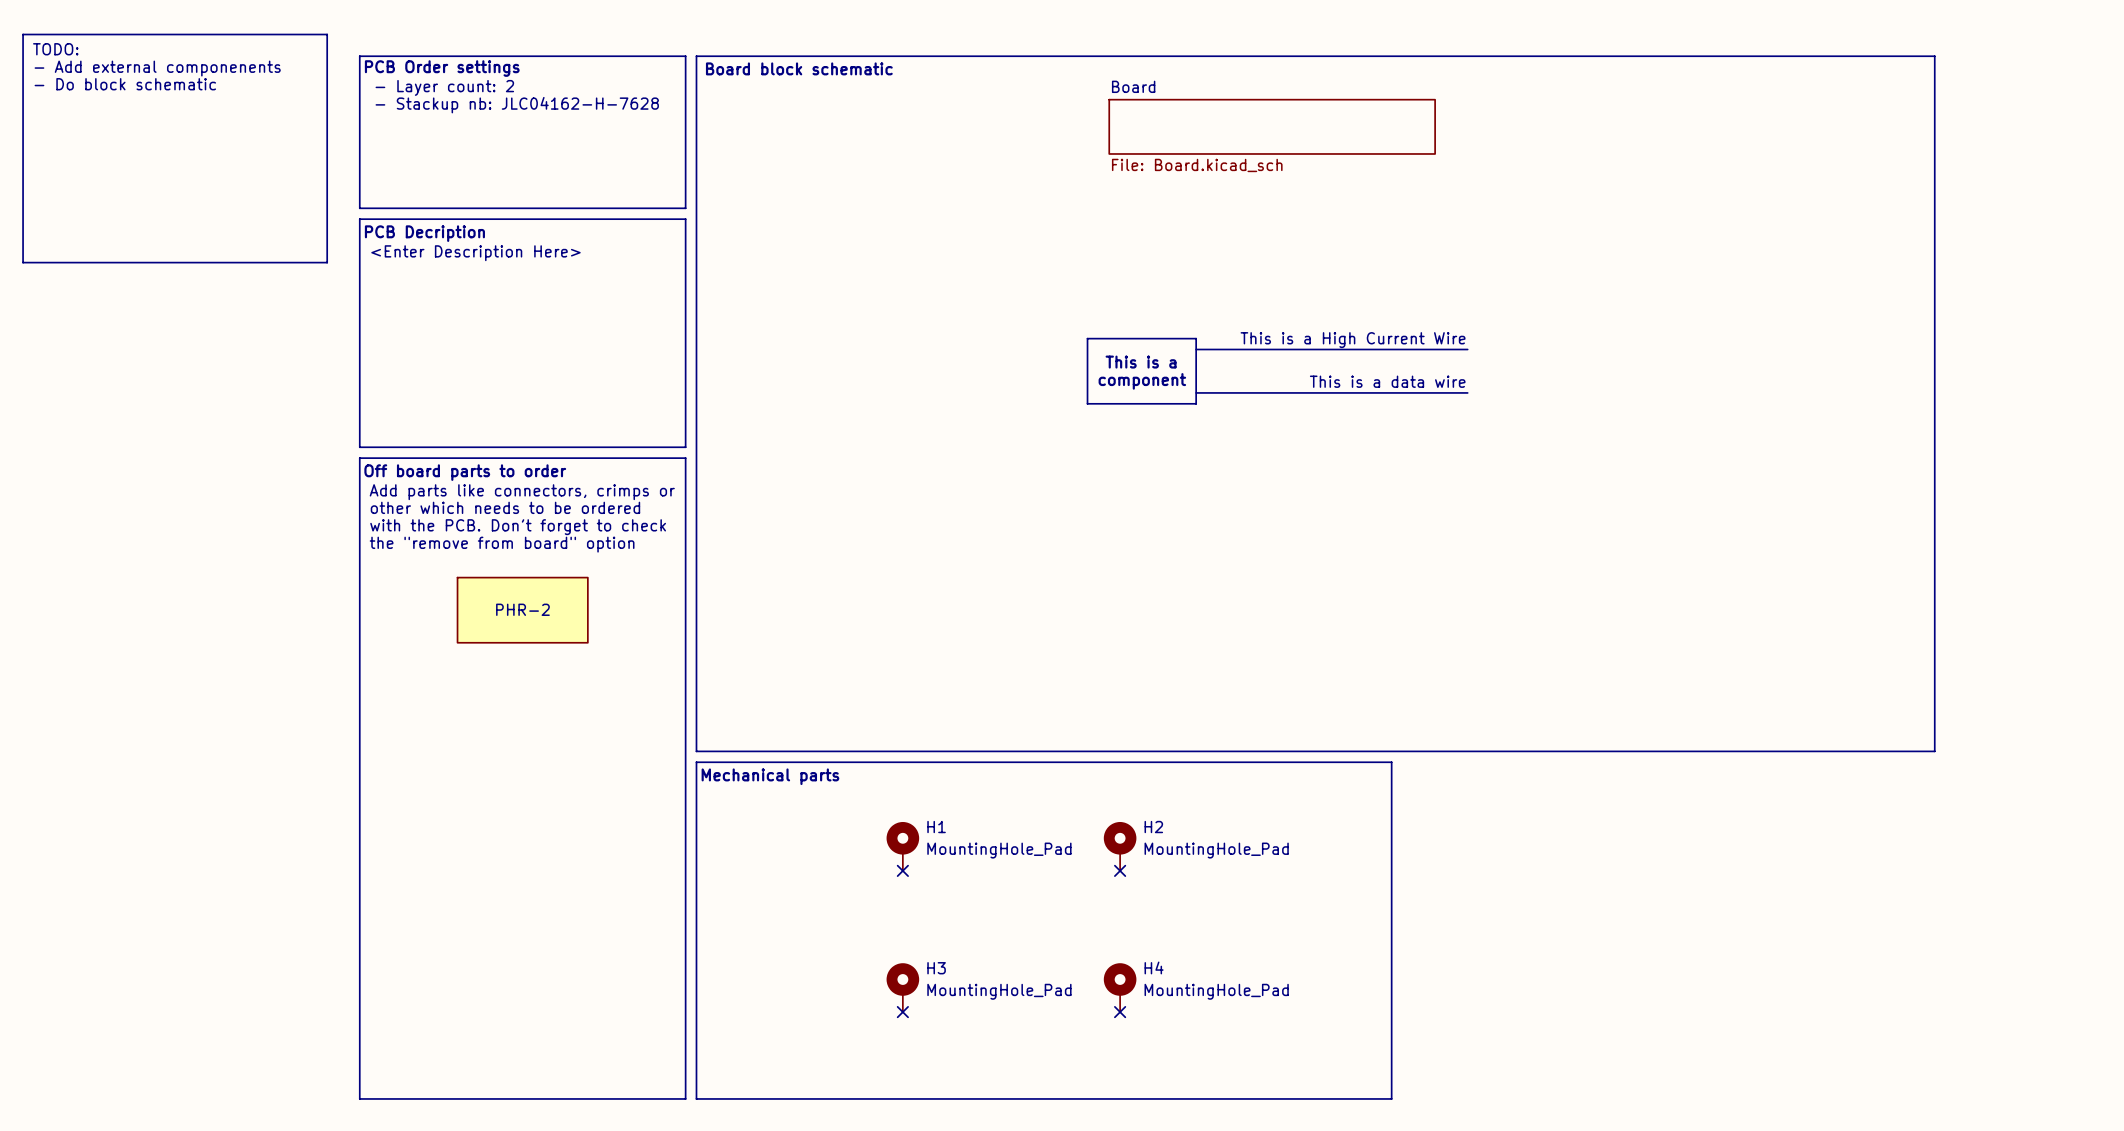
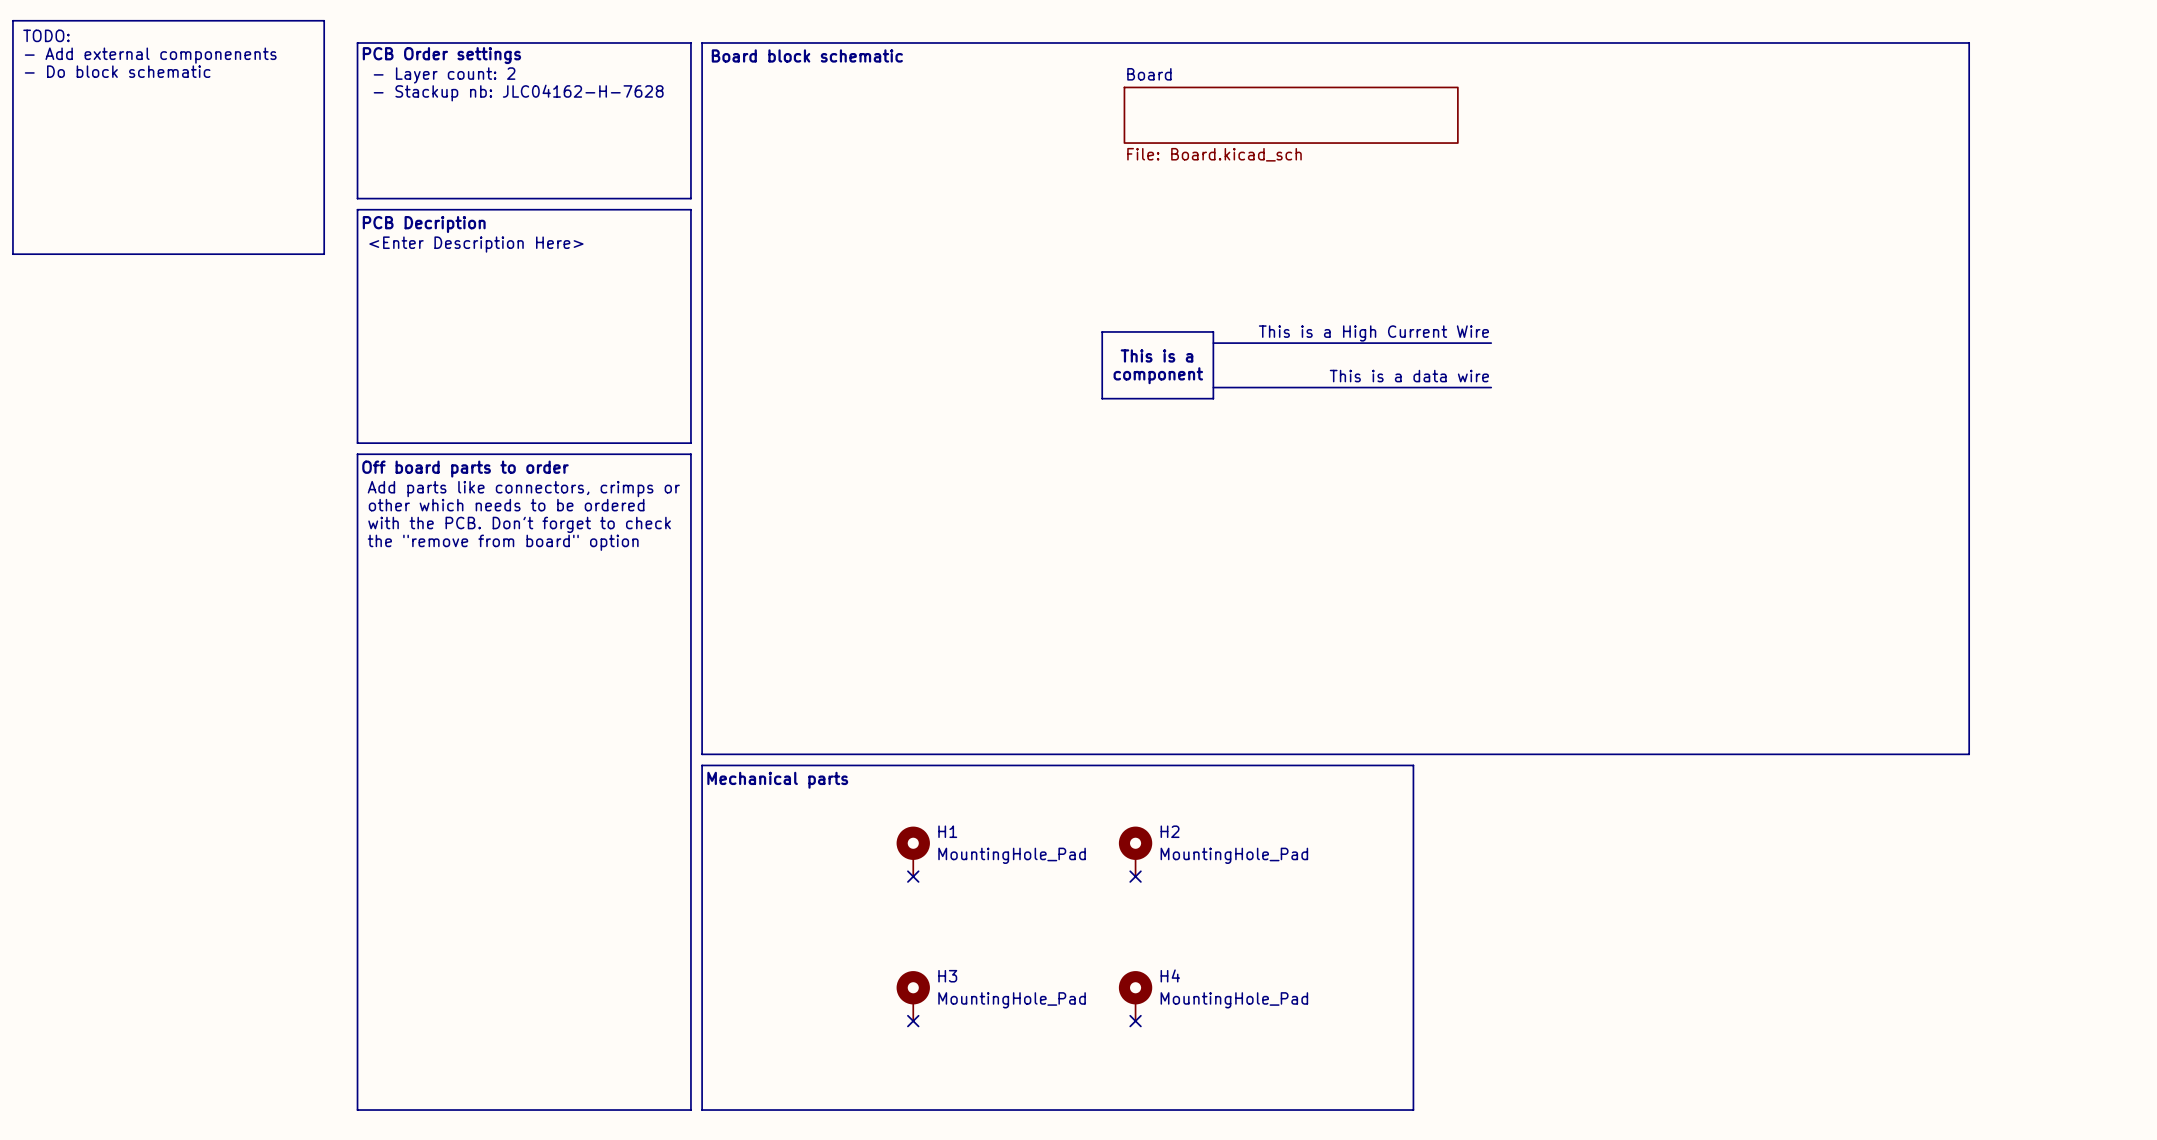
part: PHR-2 (522, 610) -> none

